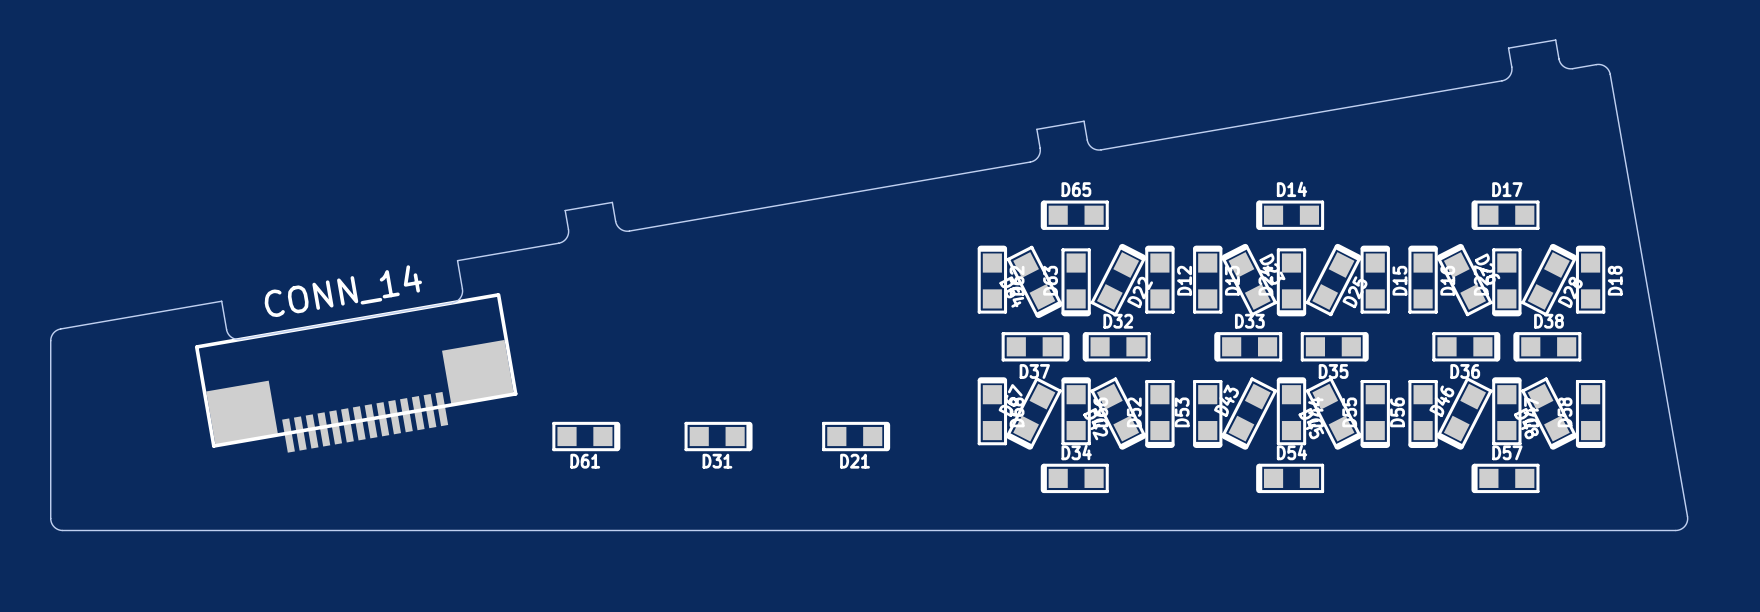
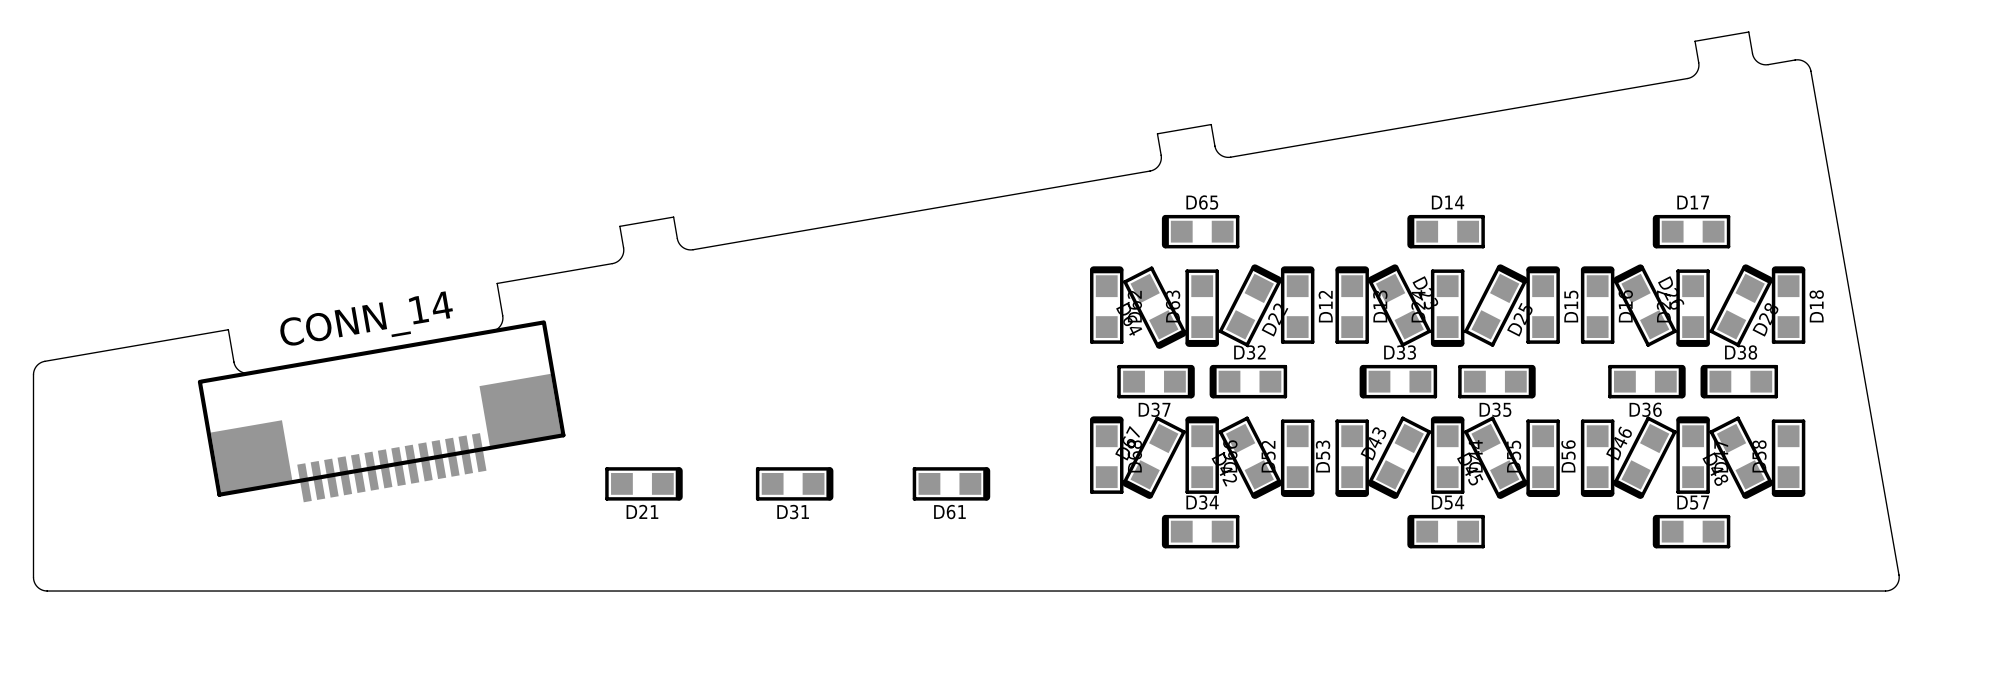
D61 name: D61 (585, 461) -> D21 (642, 511)
D21 name: D21 (855, 461) -> D61 (949, 512)

